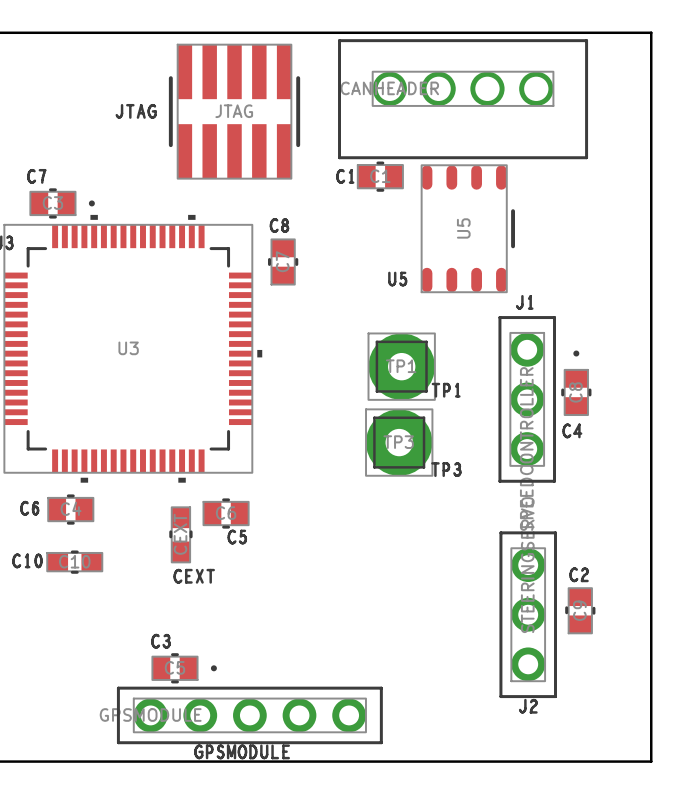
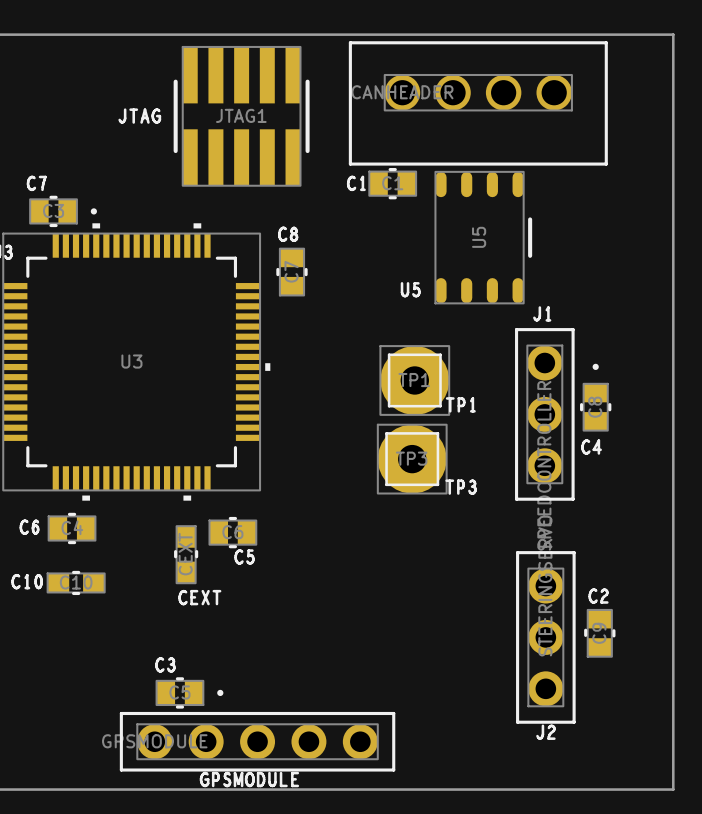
JTAG name: JTAG (234, 111) -> JTAG1 (241, 115)

